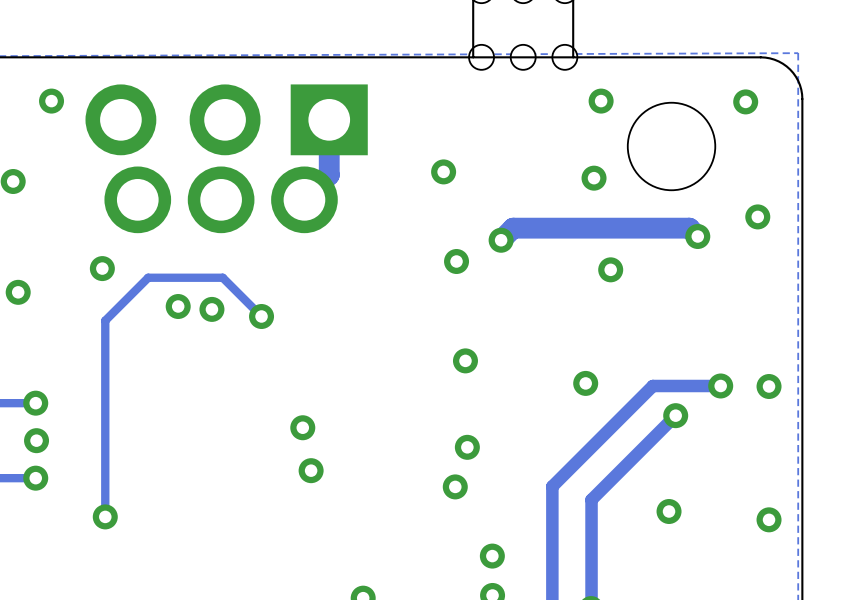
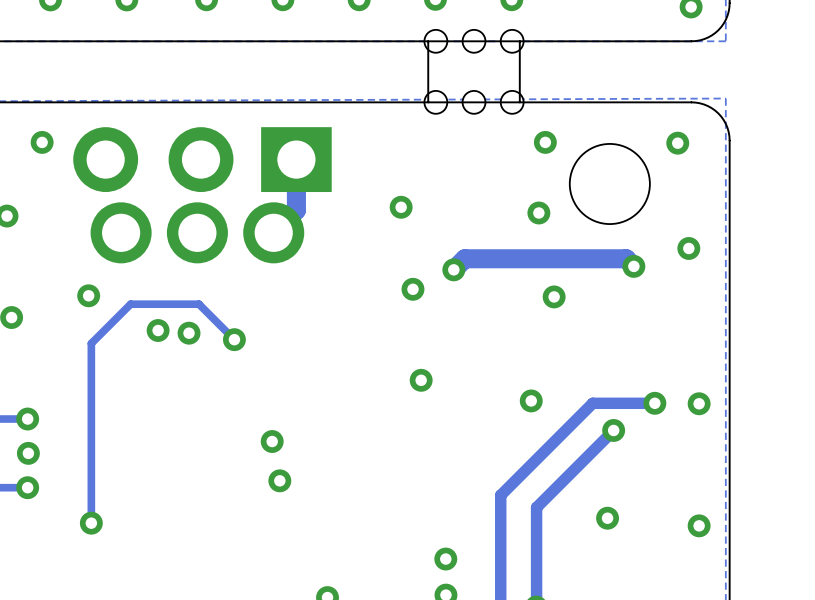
via: (467, 447) -> none
via: (455, 486) -> none

